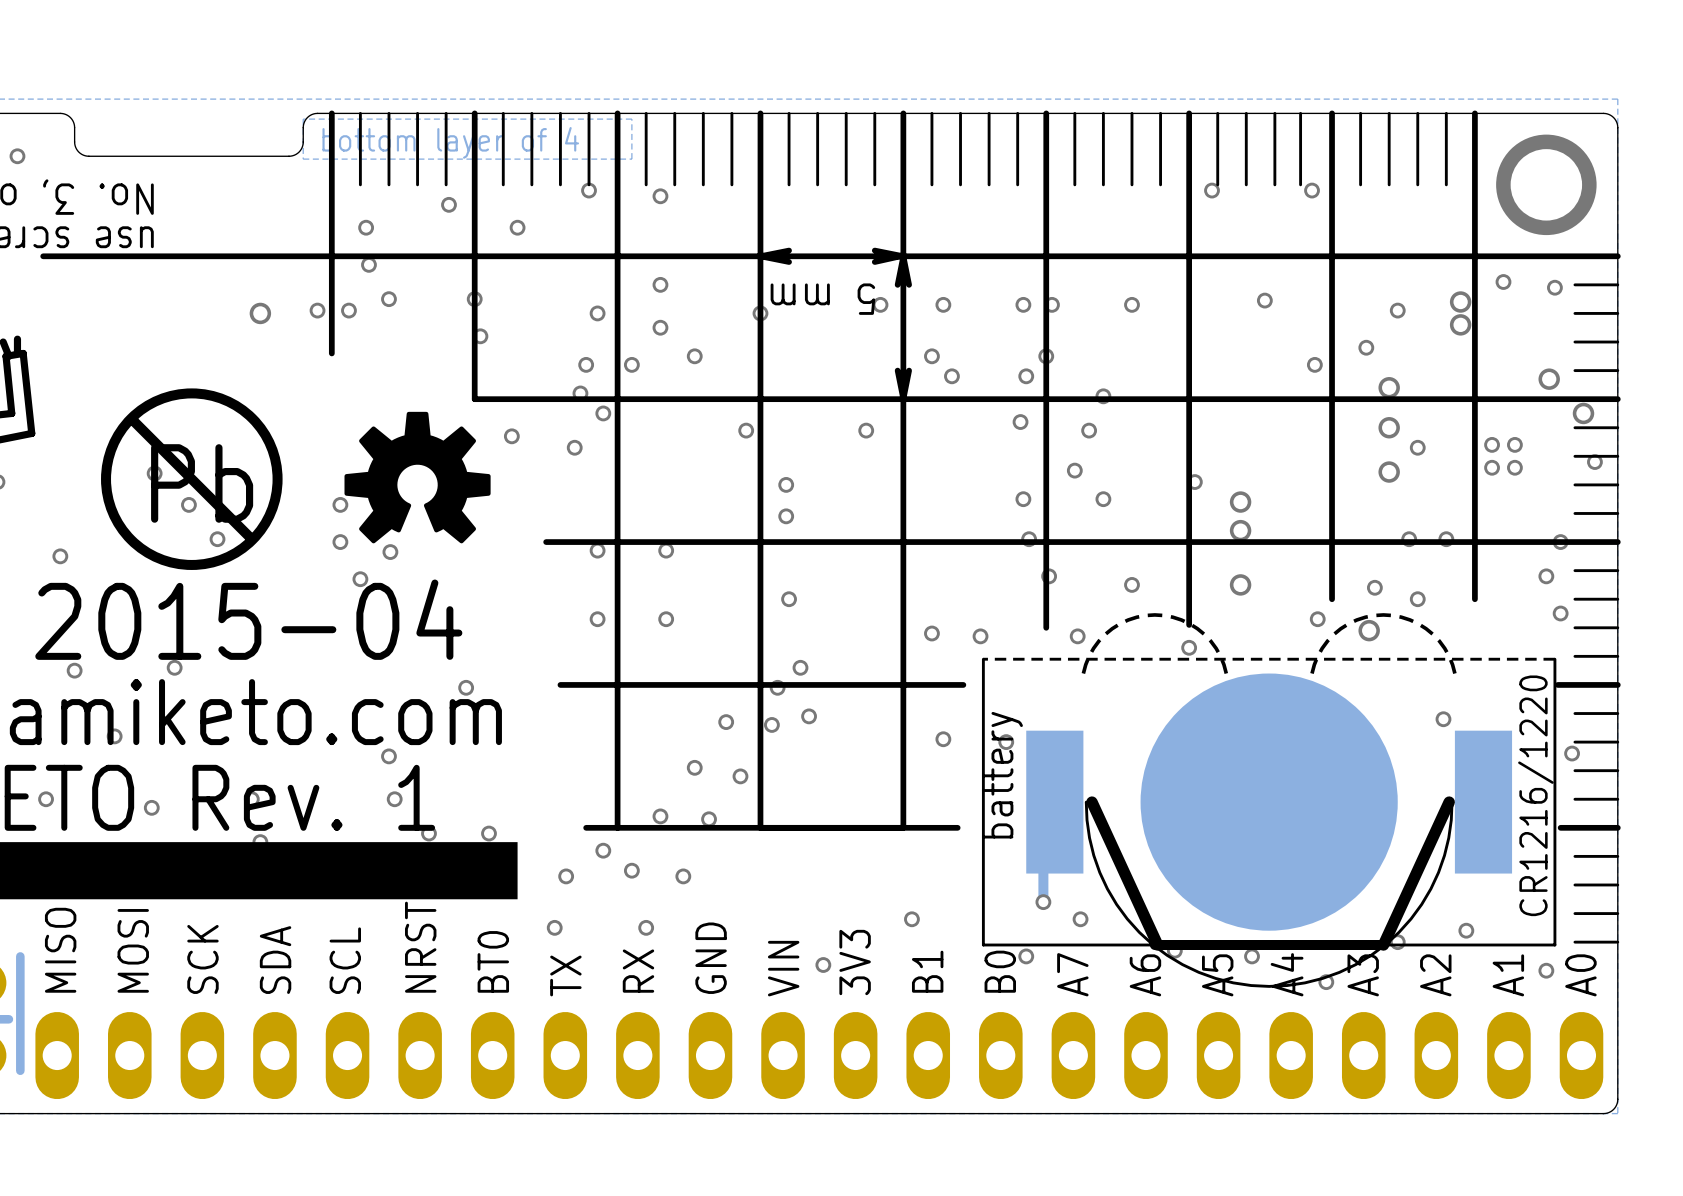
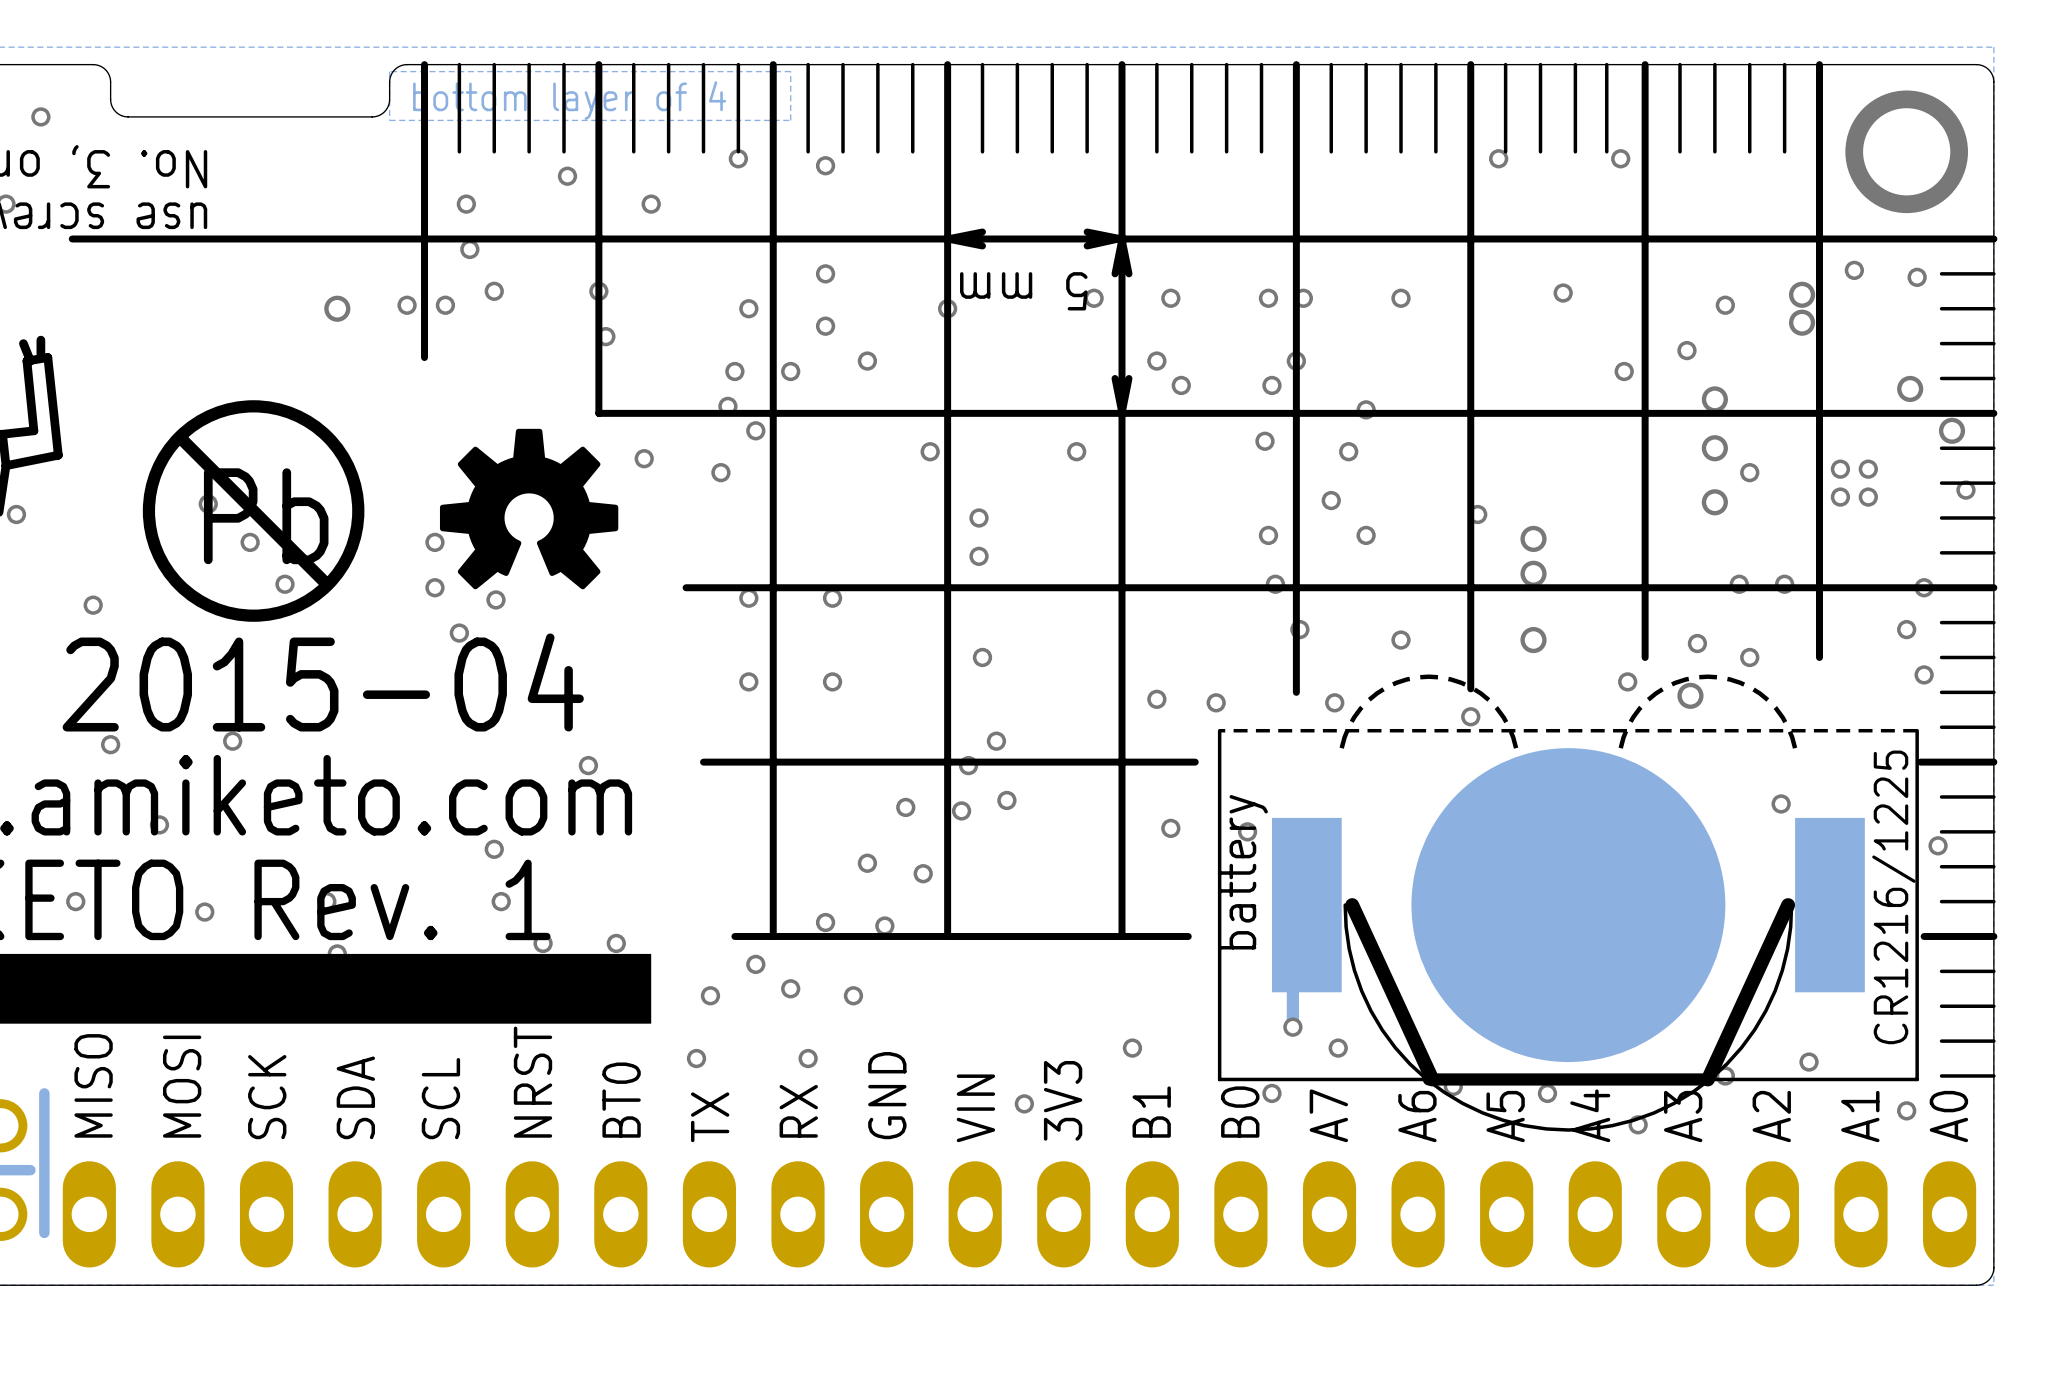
text: CR1216/1220 (1535, 795) -> CR1216/1225 (1893, 897)

